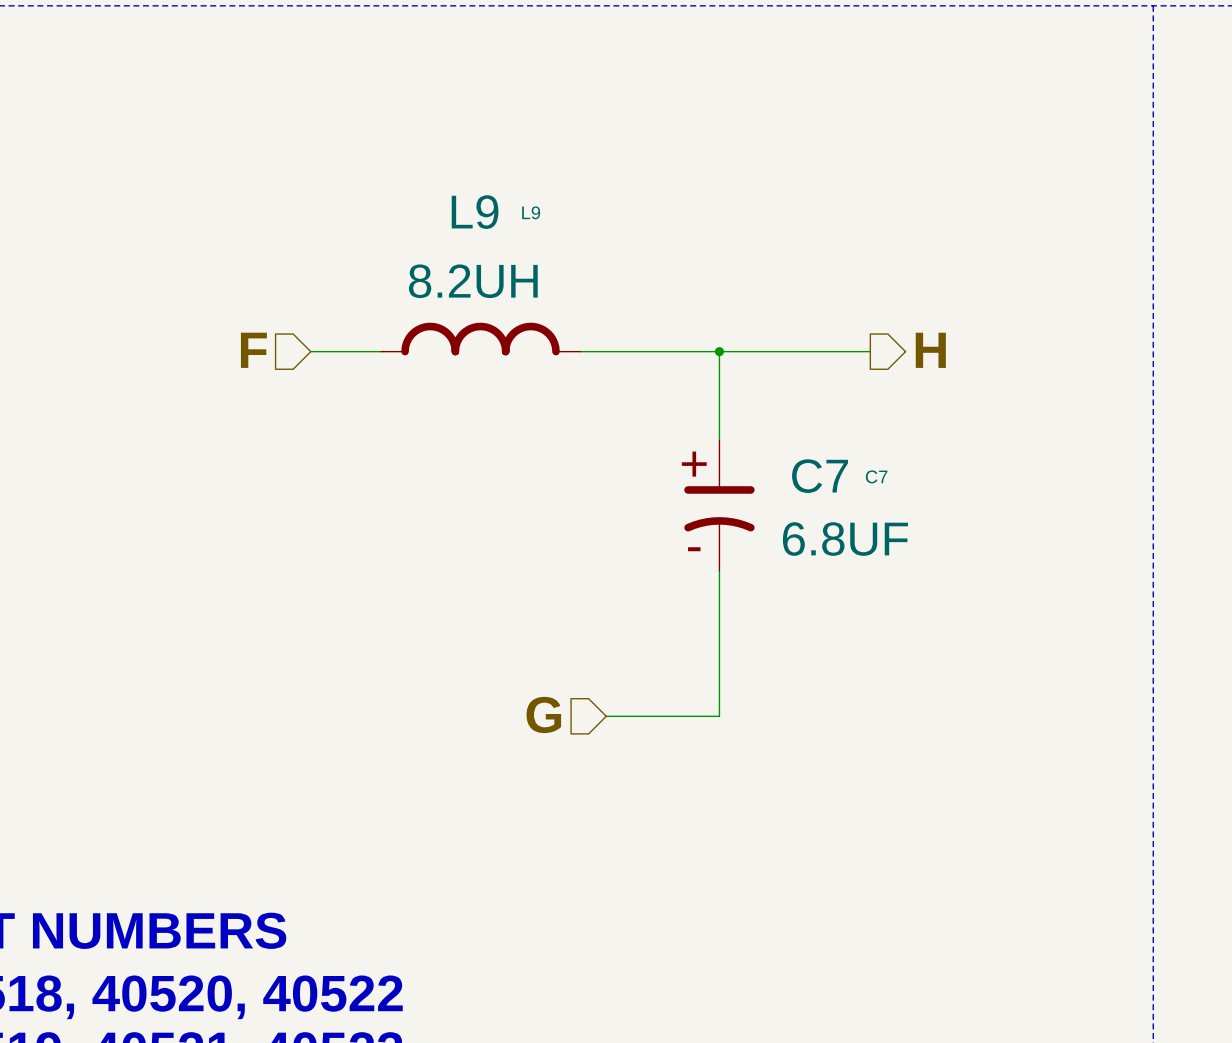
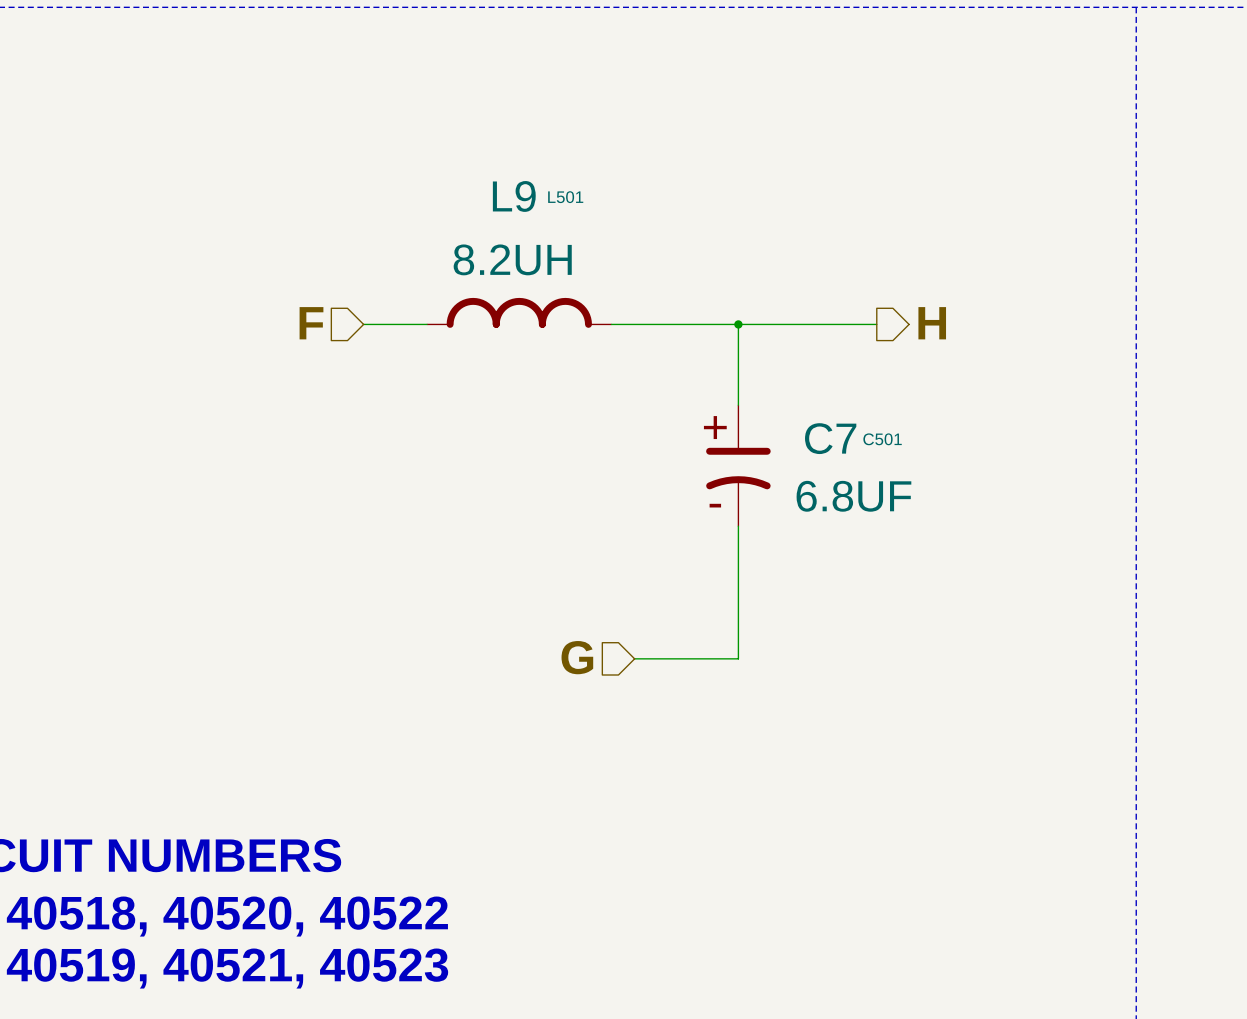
L9 name: L9 (531, 212) -> L501 (565, 197)
C7 name: C7 (876, 476) -> C501 (882, 439)

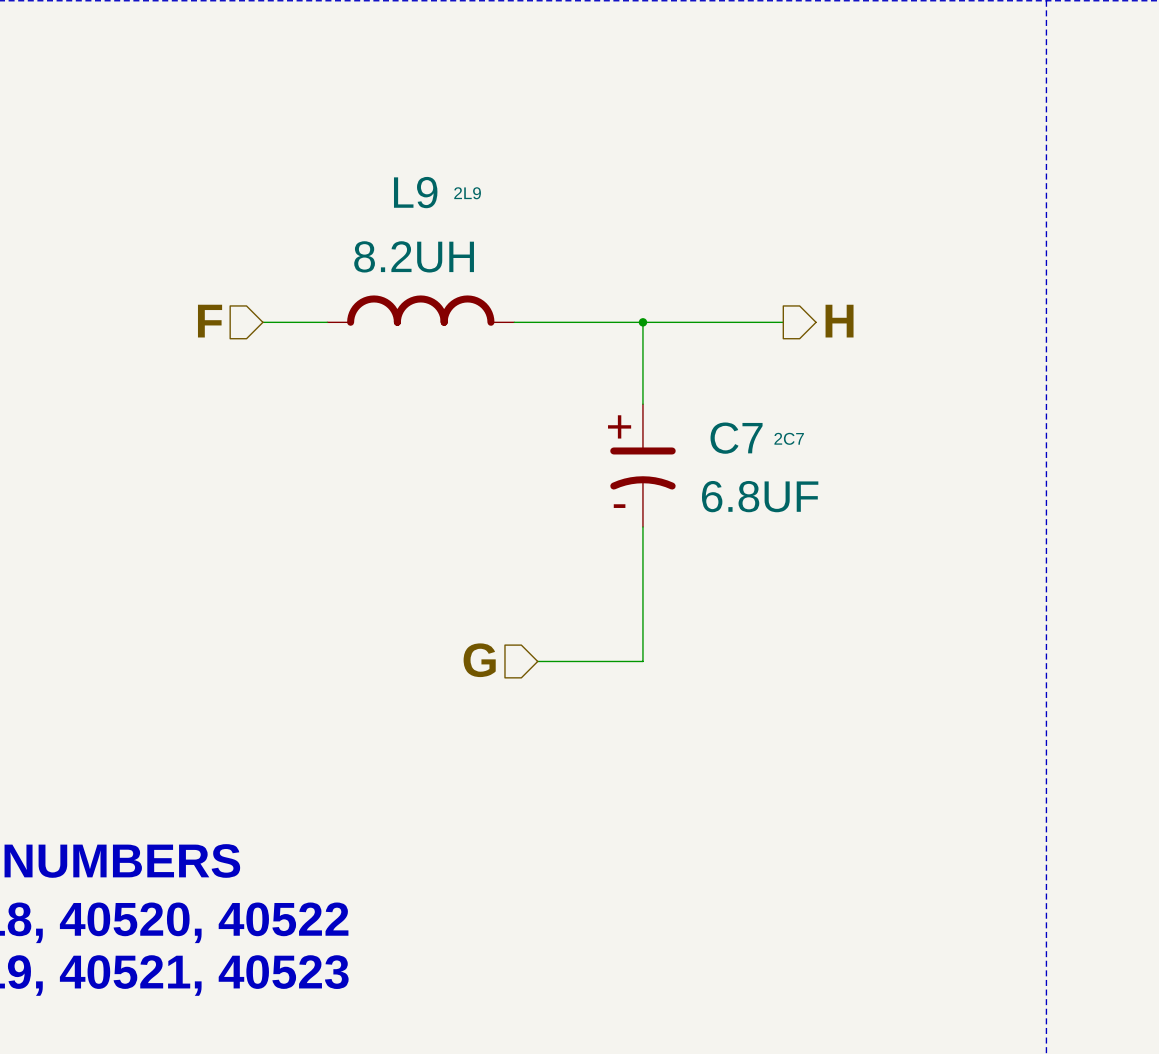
L501 name: L501 (565, 197) -> 2L9 (467, 193)
C501 name: C501 (882, 439) -> 2C7 (789, 438)

